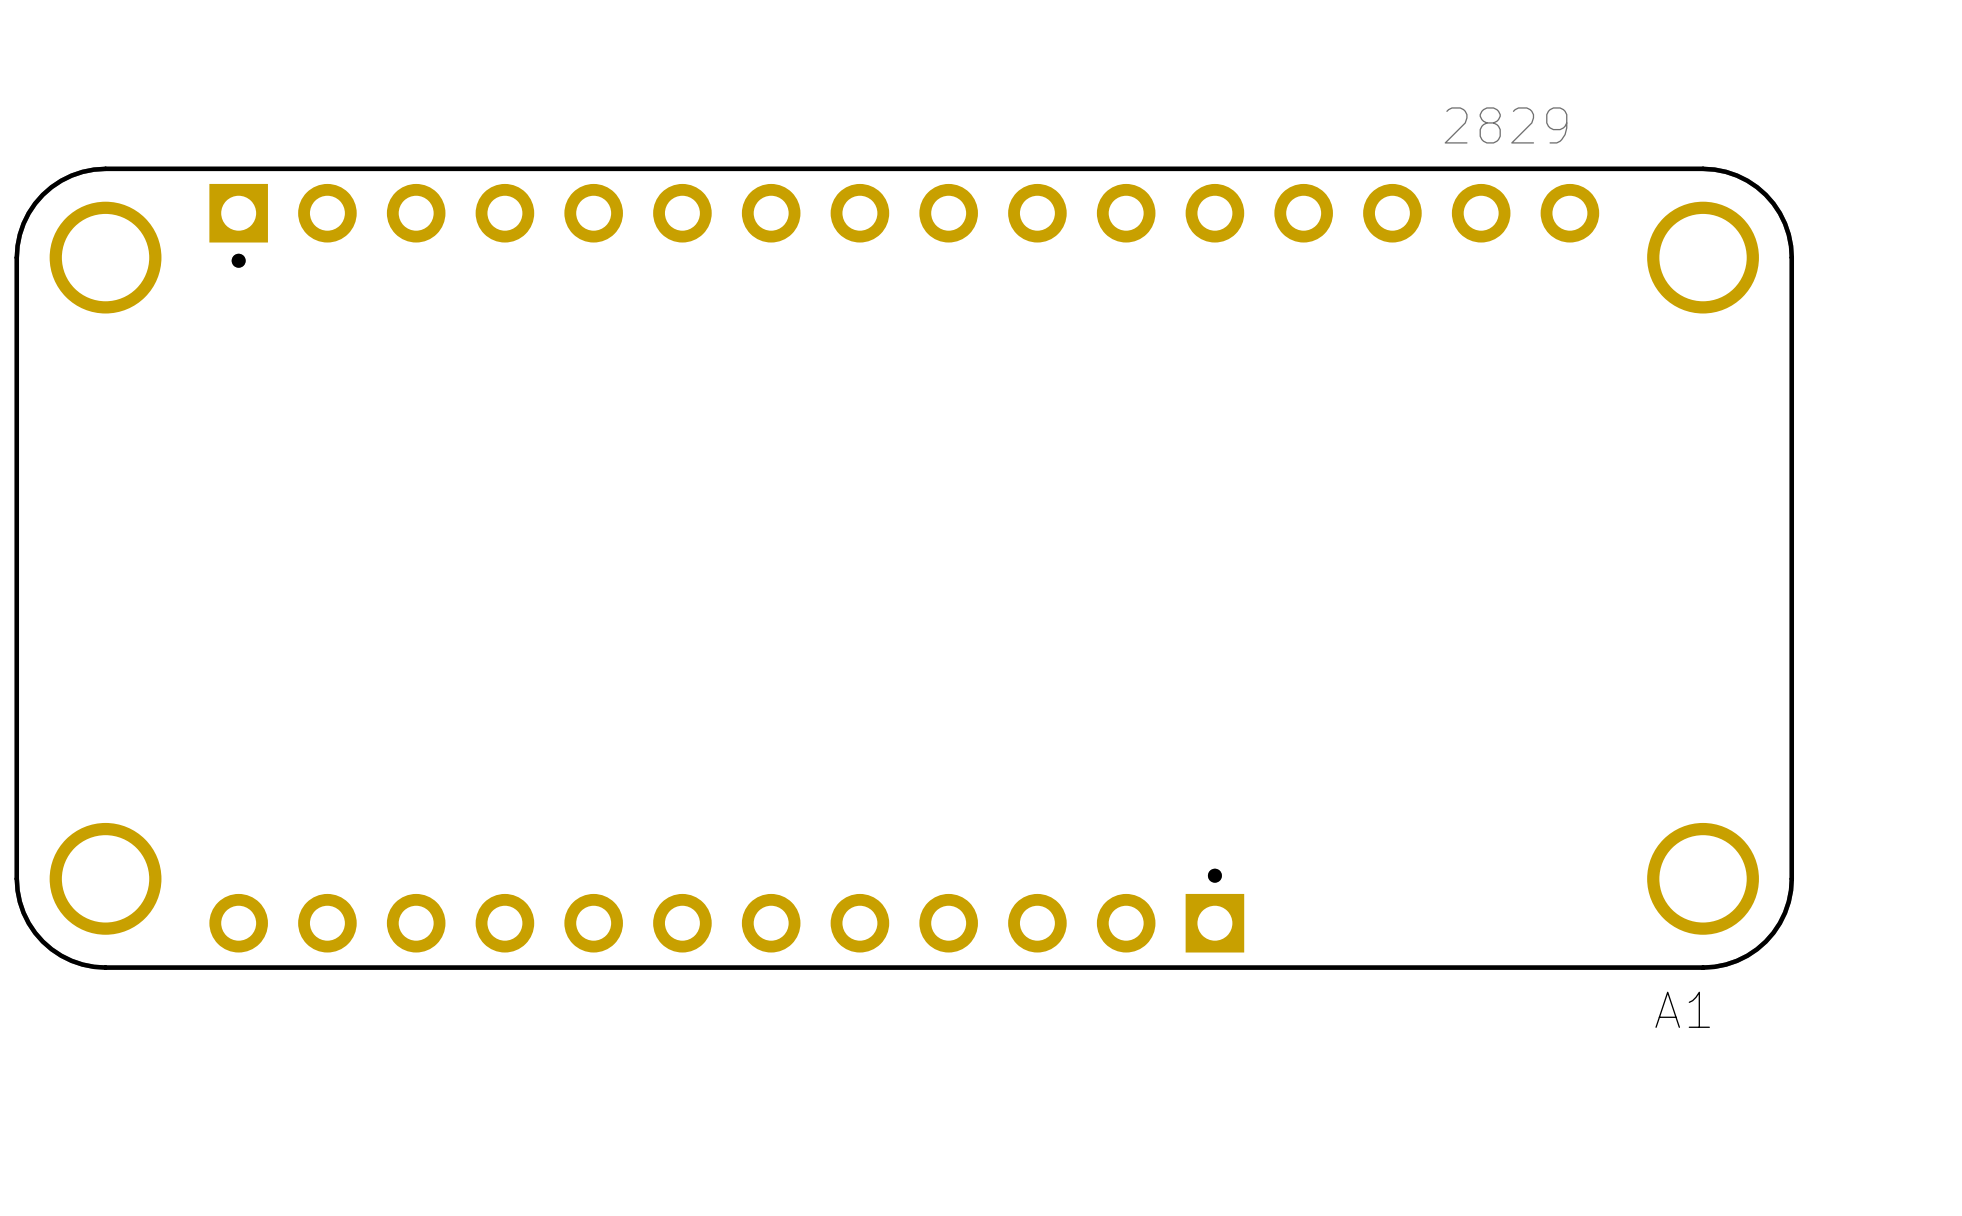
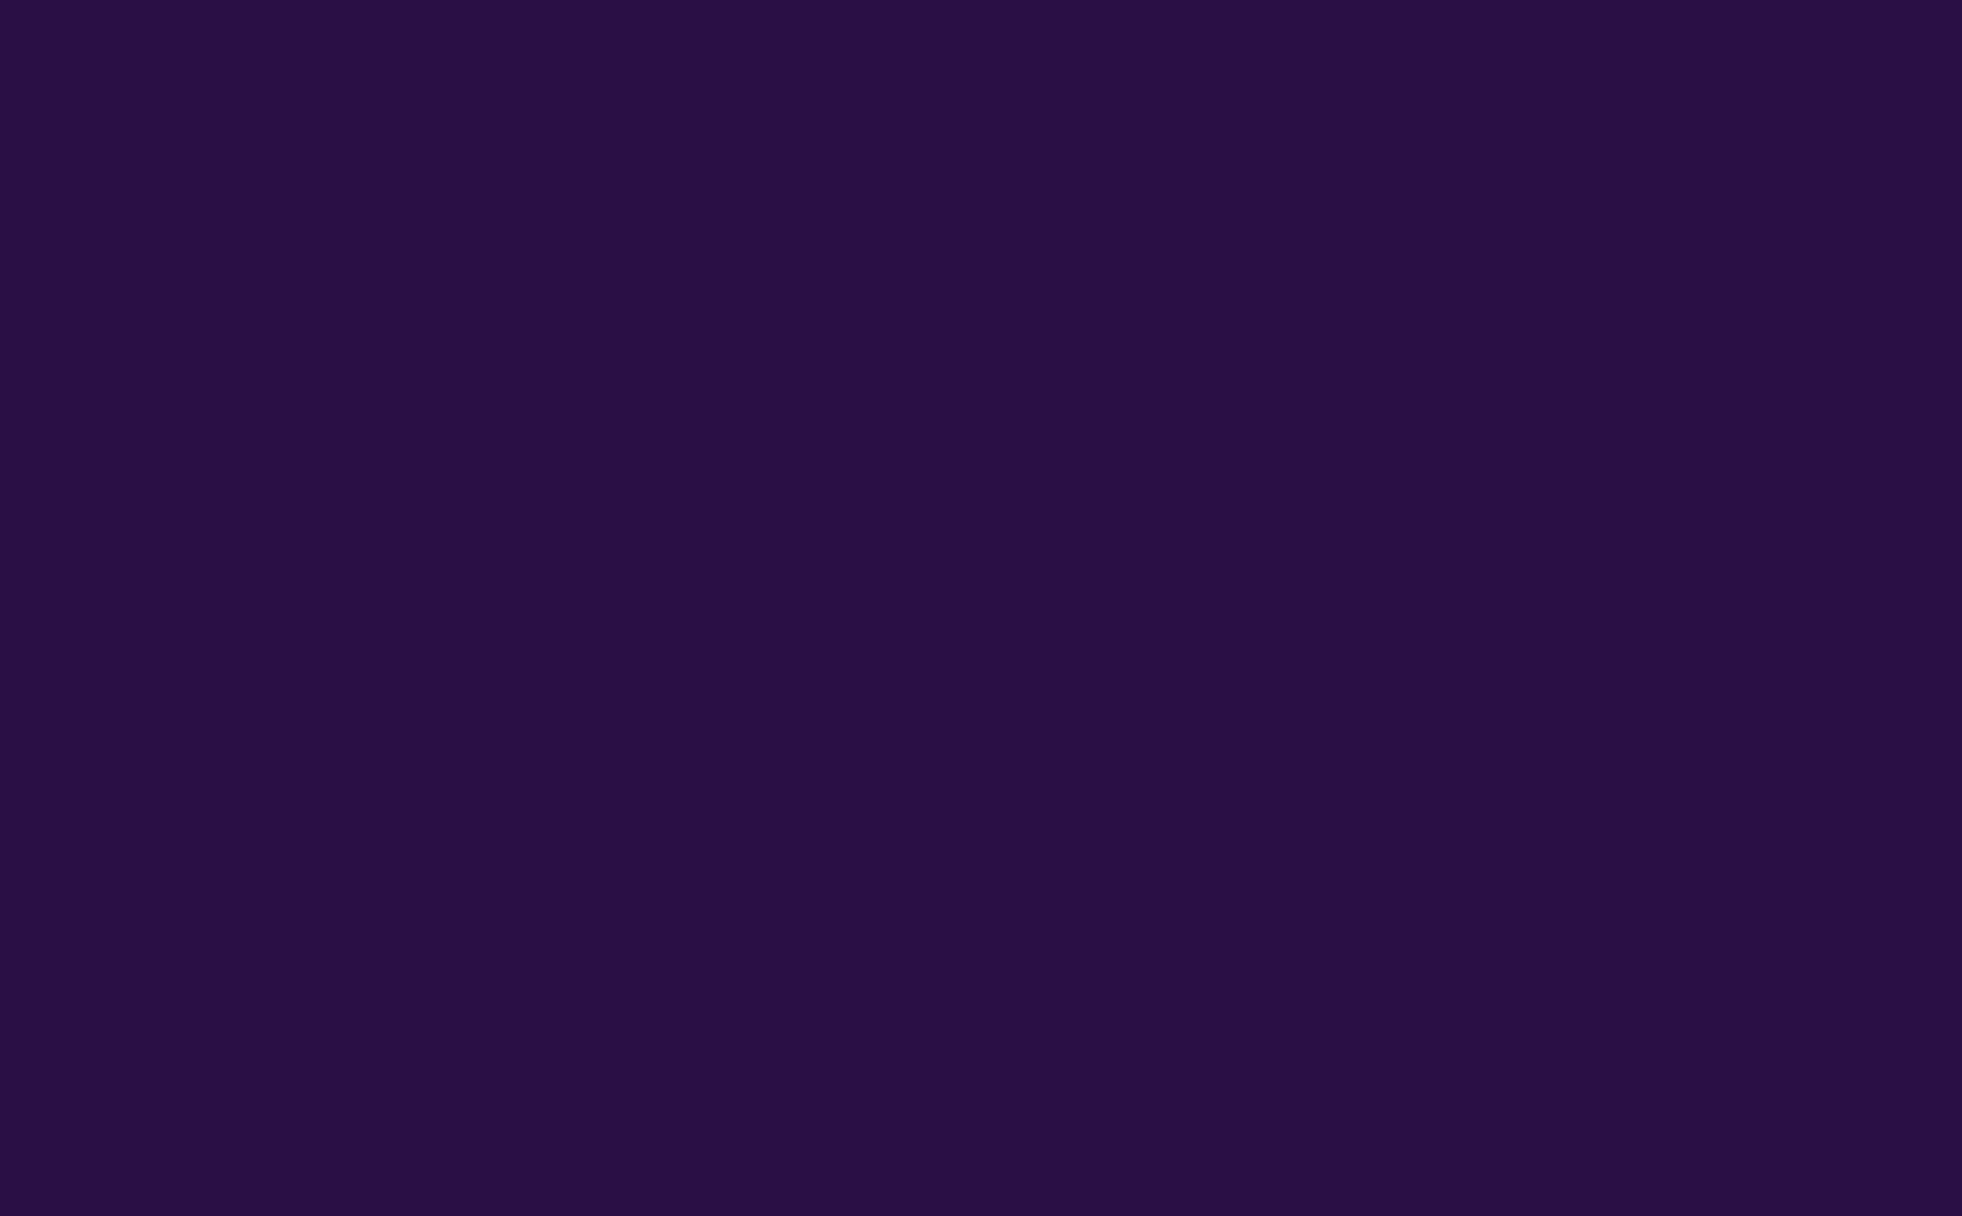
A1: 2829 (904, 568) -> none

